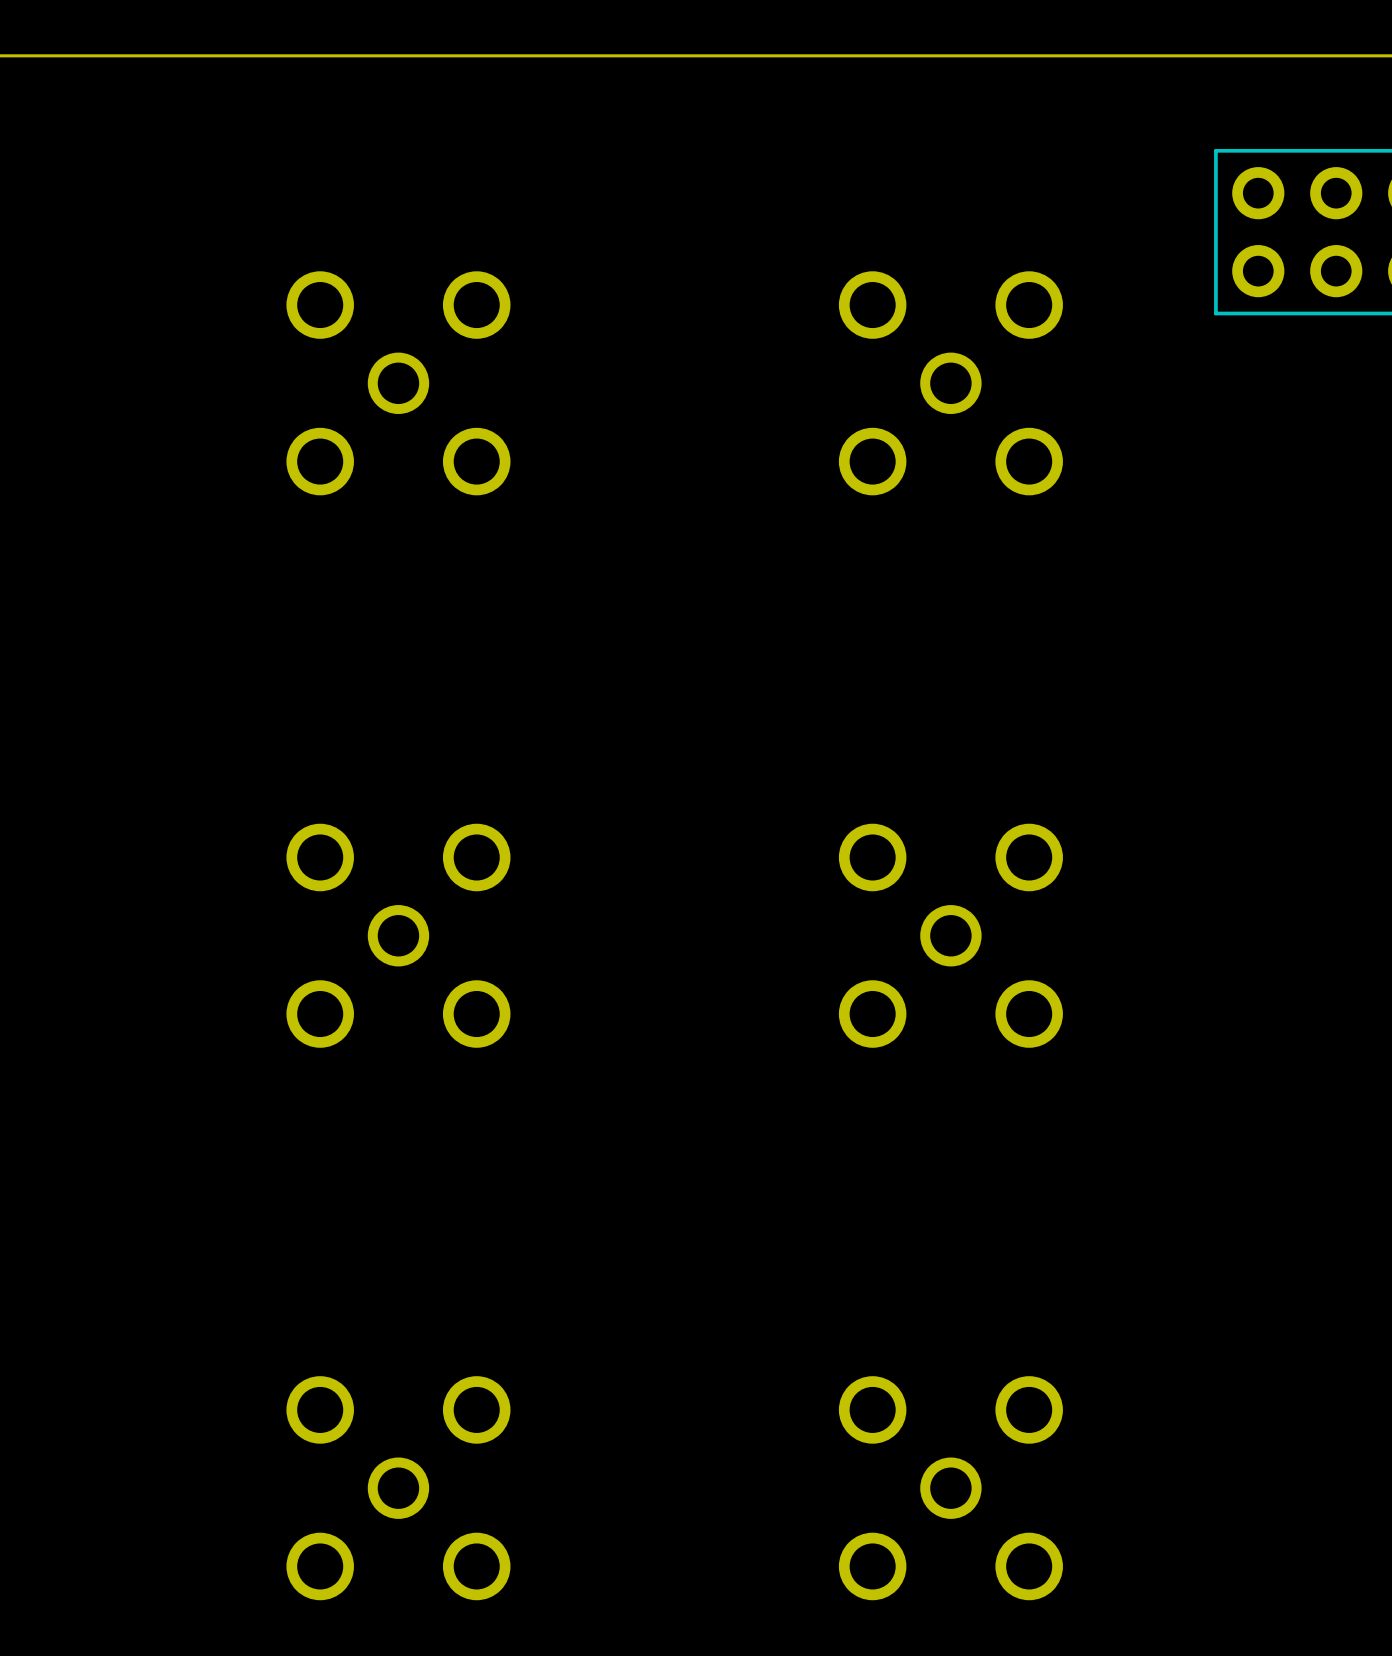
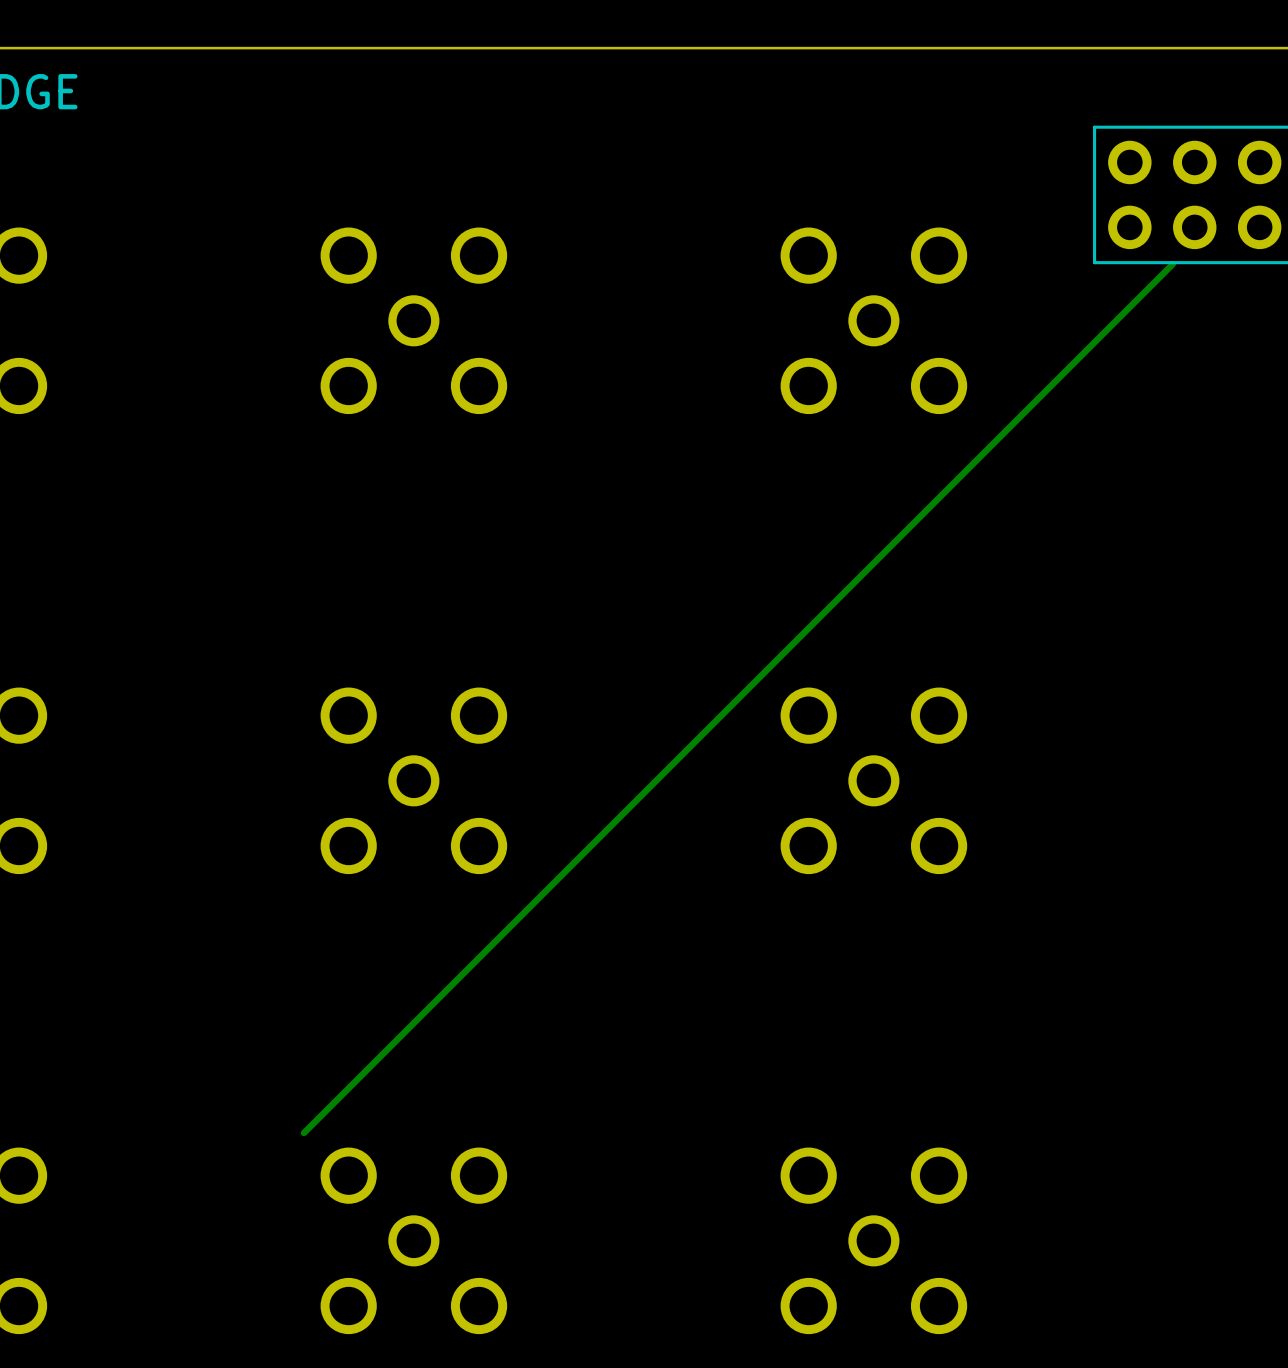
track: none -> (1172, 264) (303, 1132)

